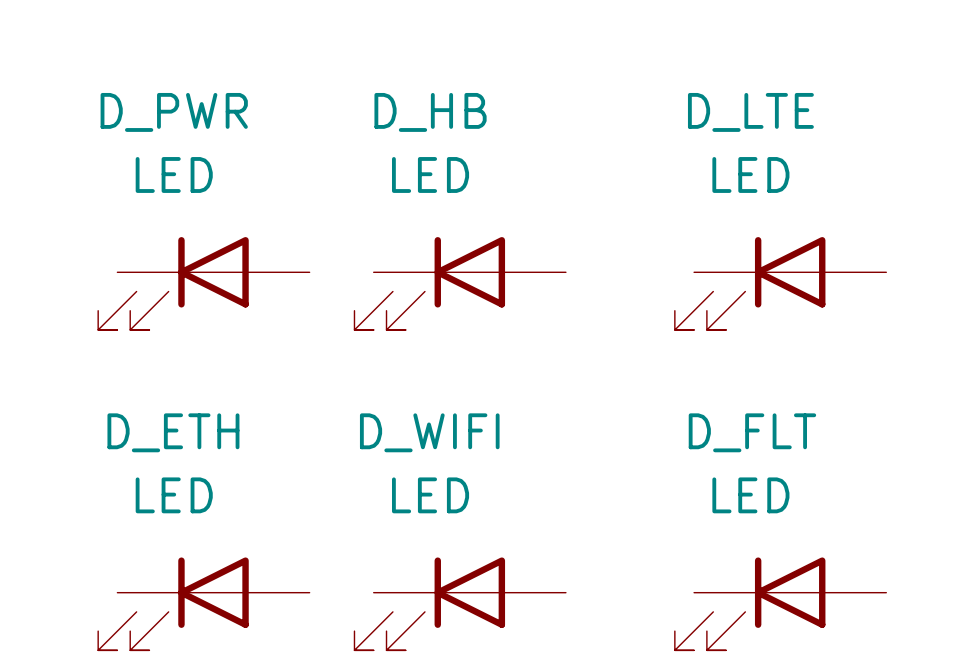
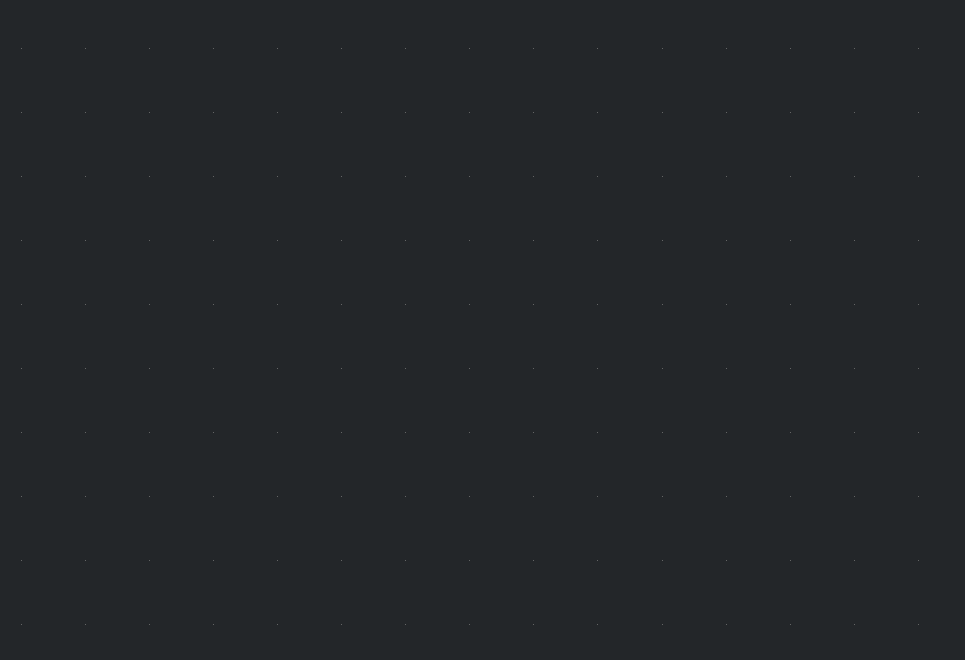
D_PWR: LED (203, 283) -> none
D_HB: LED (460, 283) -> none
D_LTE: LED (780, 283) -> none
D_ETH: LED (203, 603) -> none
D_WIFI: LED (460, 603) -> none
D_FLT: LED (780, 603) -> none

